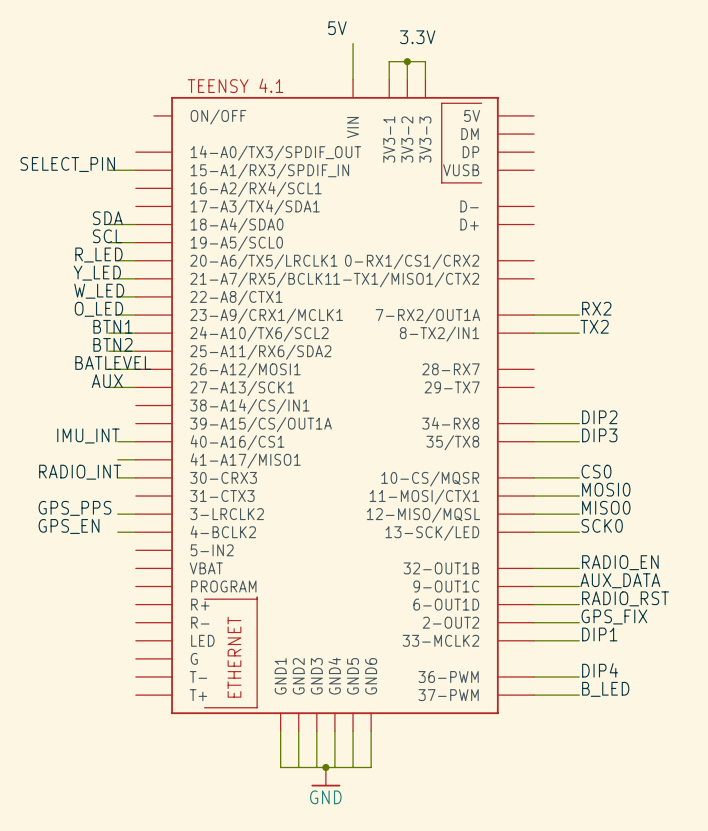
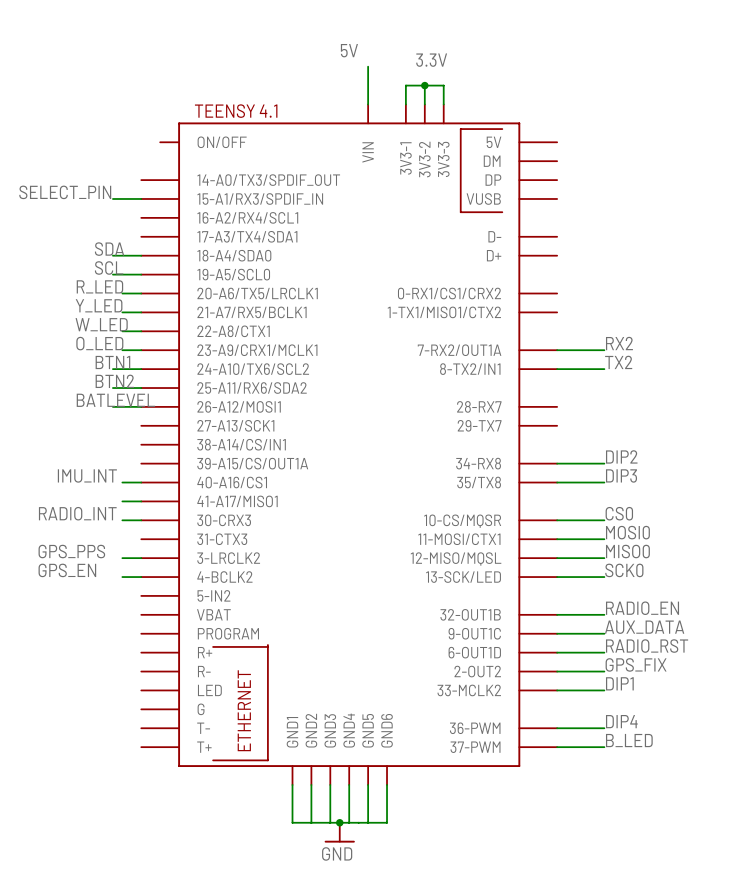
label: AUX (107, 381) -> none
wire: (108, 387) (135, 387) -> none

